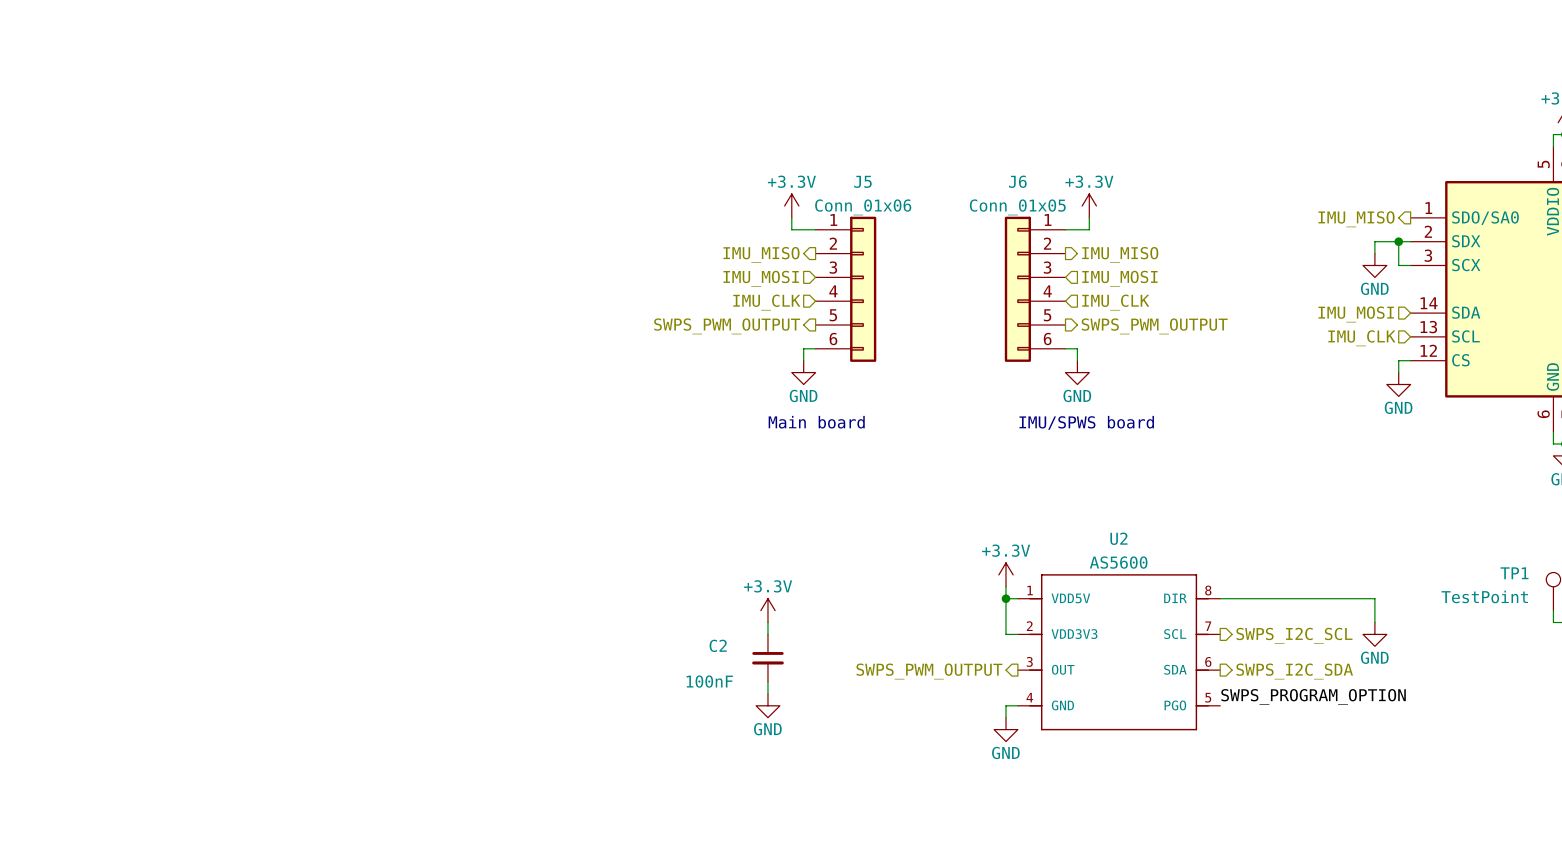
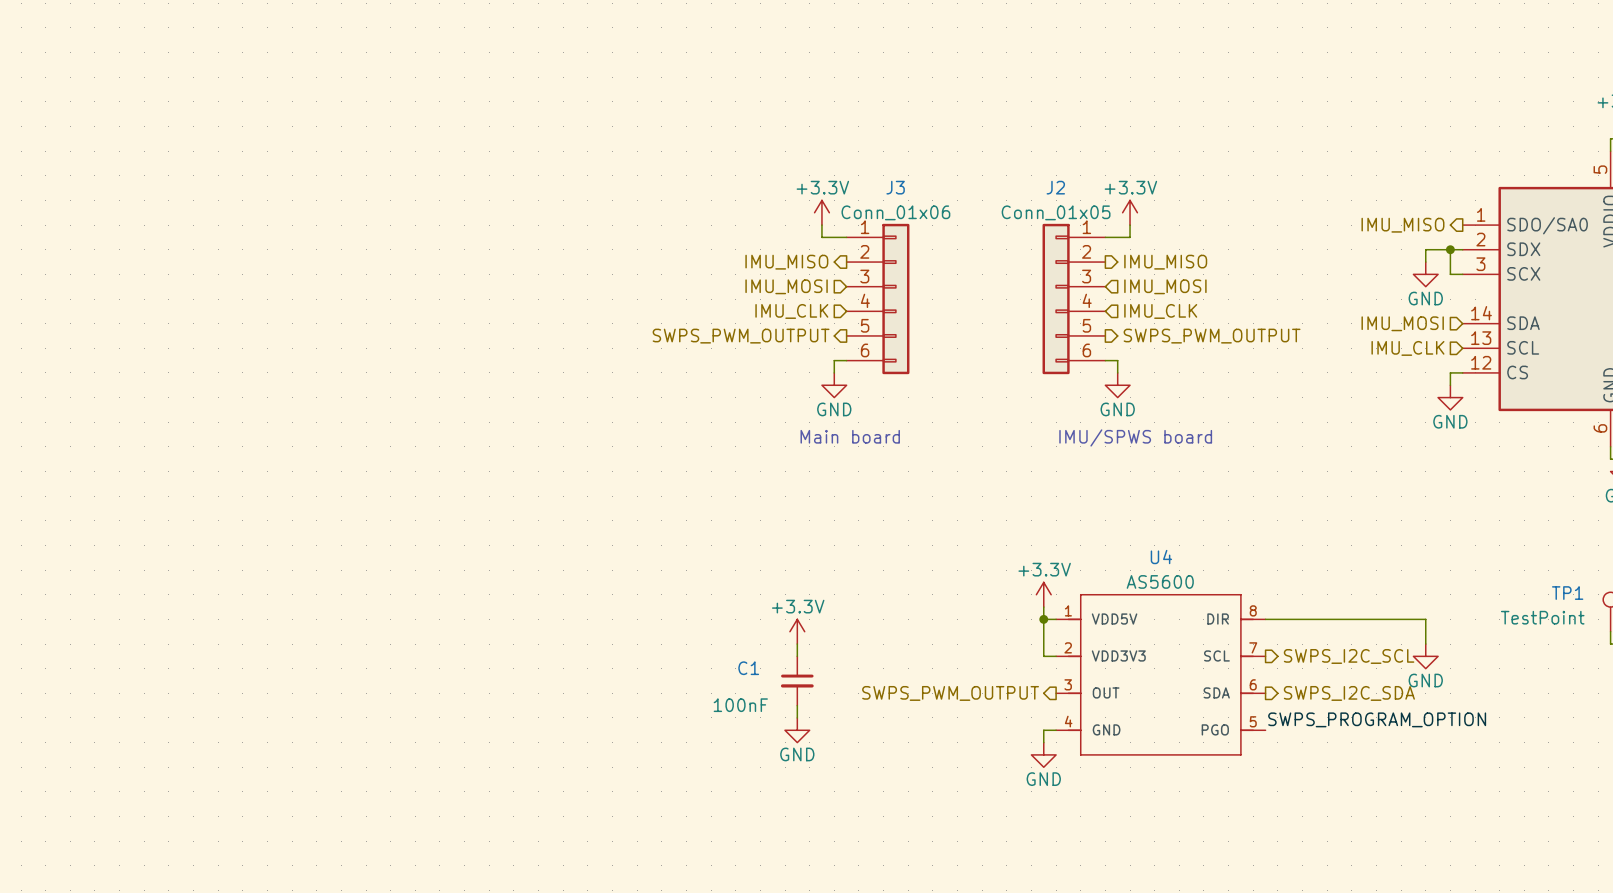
J5 name: J5 (862, 181) -> J3 (895, 187)
J6 name: J6 (1017, 181) -> J2 (1055, 187)
U2 name: U2 (1118, 538) -> U4 (1161, 557)
C2 name: C2 (718, 645) -> C1 (748, 668)

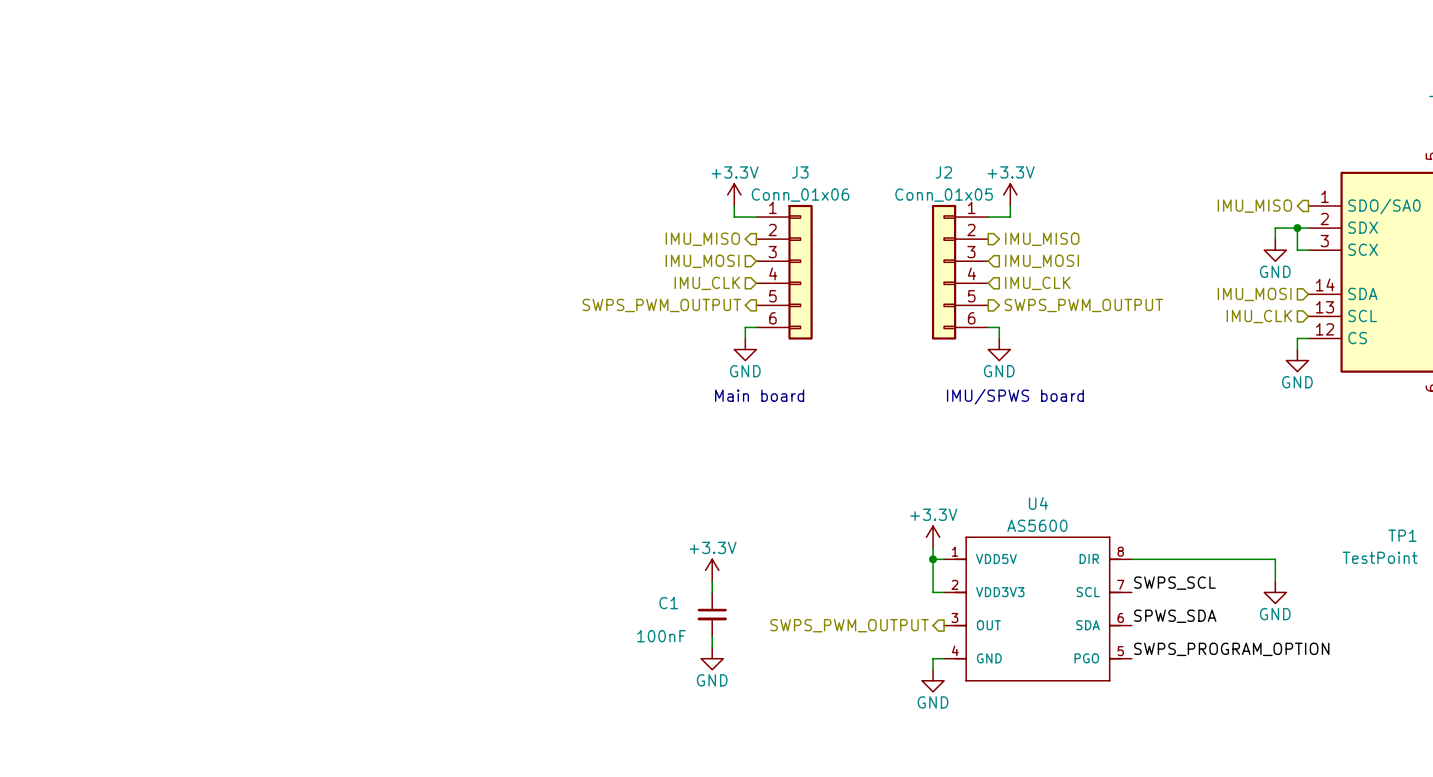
label: none -> SWPS_SCL (1174, 583)
hierarchical label: SWPS_I2C_SCL (1349, 656) -> none
label: none -> SPWS_SDA (1175, 616)
hierarchical label: SWPS_I2C_SDA (1349, 693) -> none

